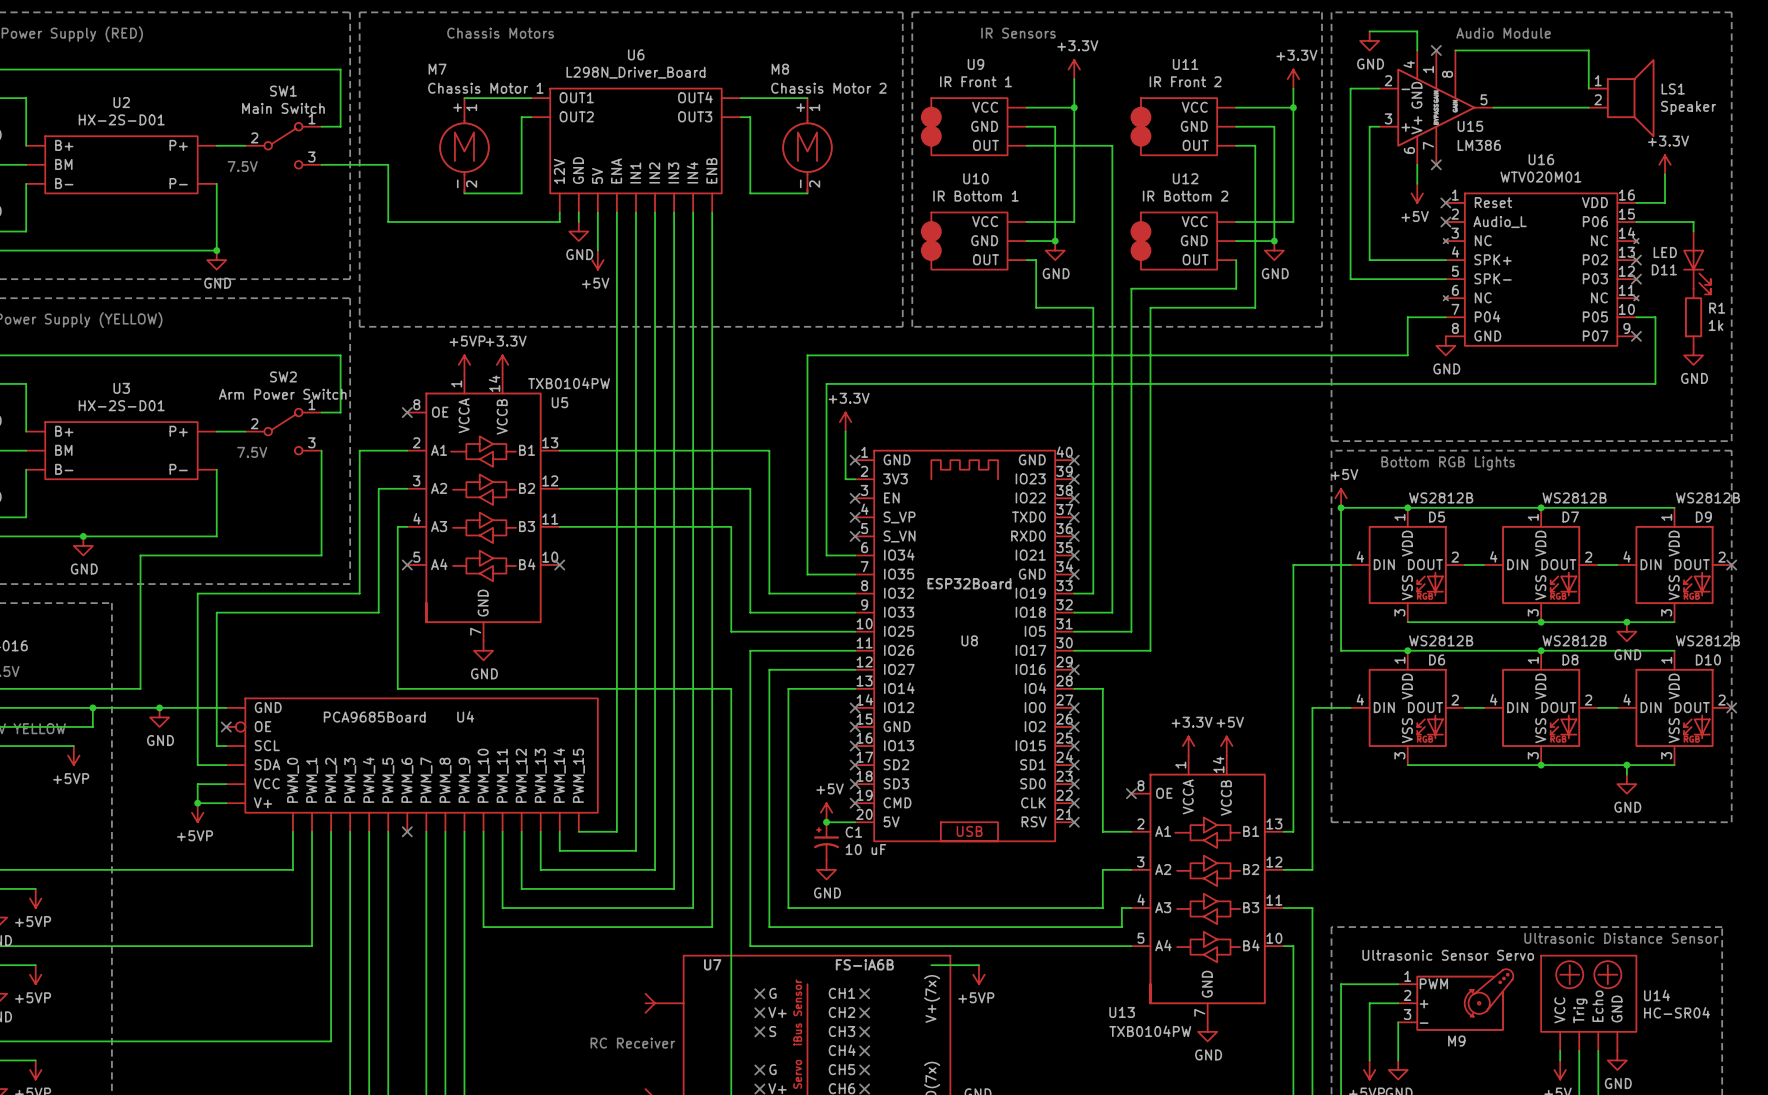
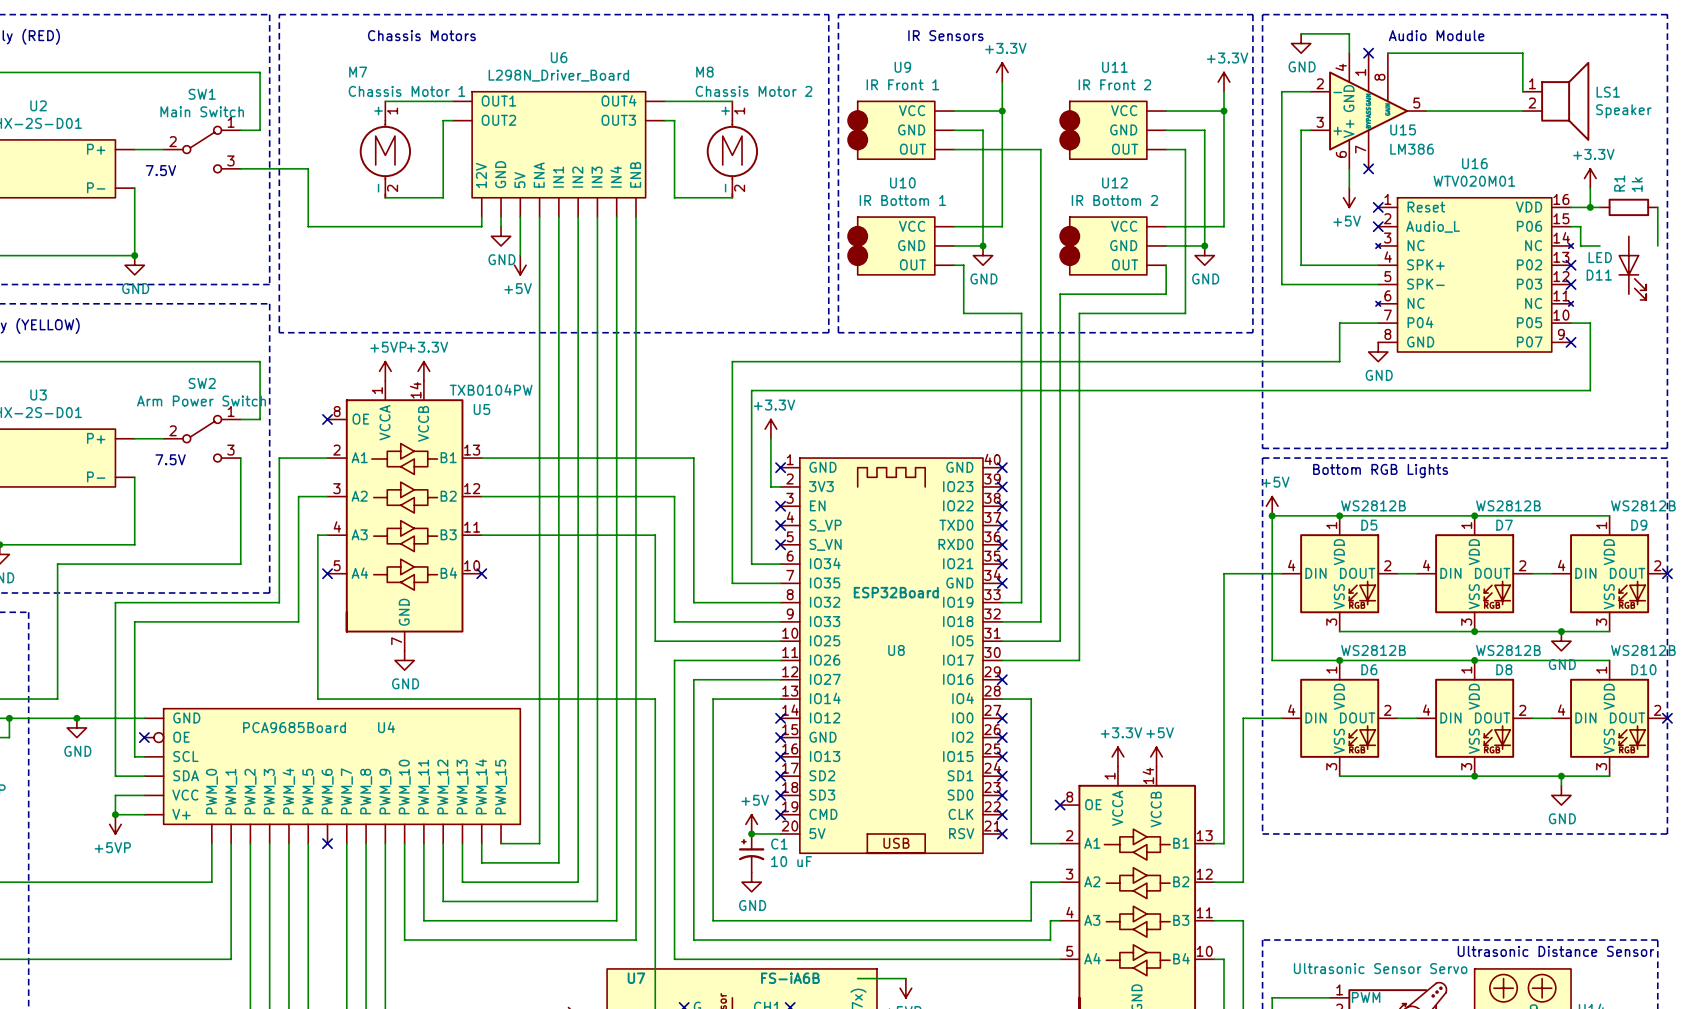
power symbol position: +3.3V (1664, 164) -> +3.3V (1590, 178)
wire: (1664, 174) (1664, 202) -> none
wire: none -> (1590, 188) (1590, 207)
junction: none -> (1590, 207)
wire: none -> (1657, 207) (1657, 245)
wire: (1645, 221) (1693, 221) (1693, 231) -> (1580, 226) (1580, 245) (1599, 245)
R1 name position: R1 (1717, 308) -> R1 (1619, 183)
R1 rotation: 0° (1693, 317) -> 90° clockwise (1628, 207)
R1 position: (1693, 317) -> (1628, 207)
R1 value position: 1k (1716, 325) -> 1k (1637, 184)
power symbol: GND (1693, 355) -> none

